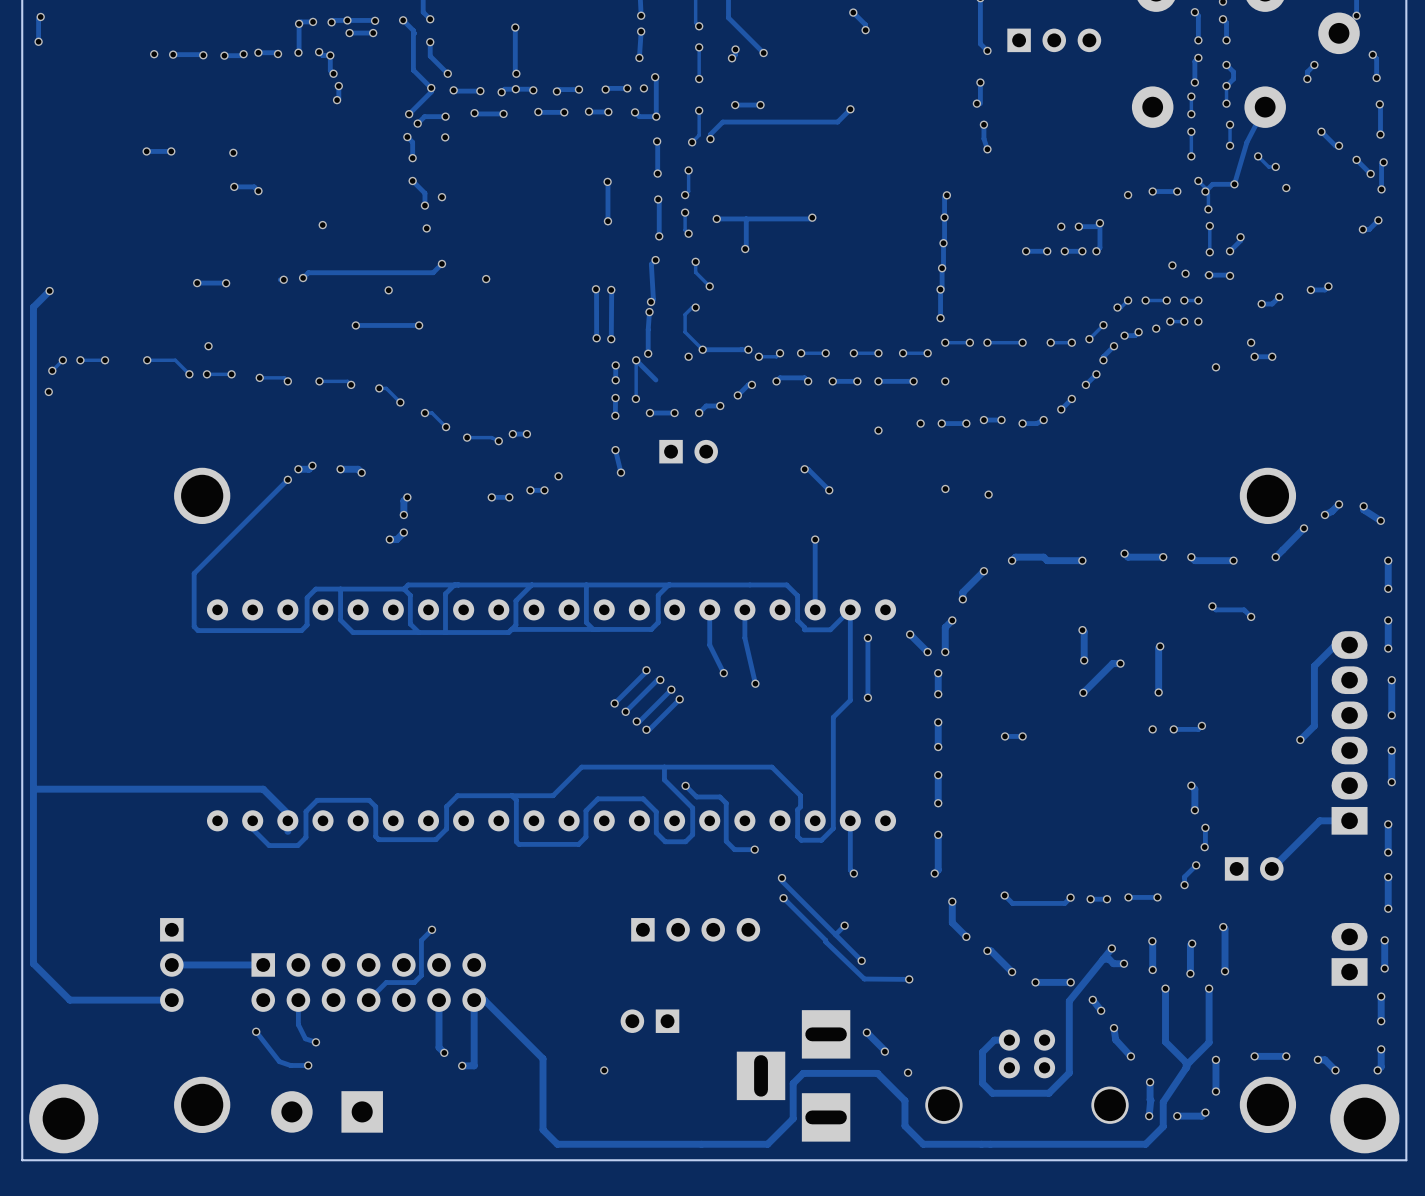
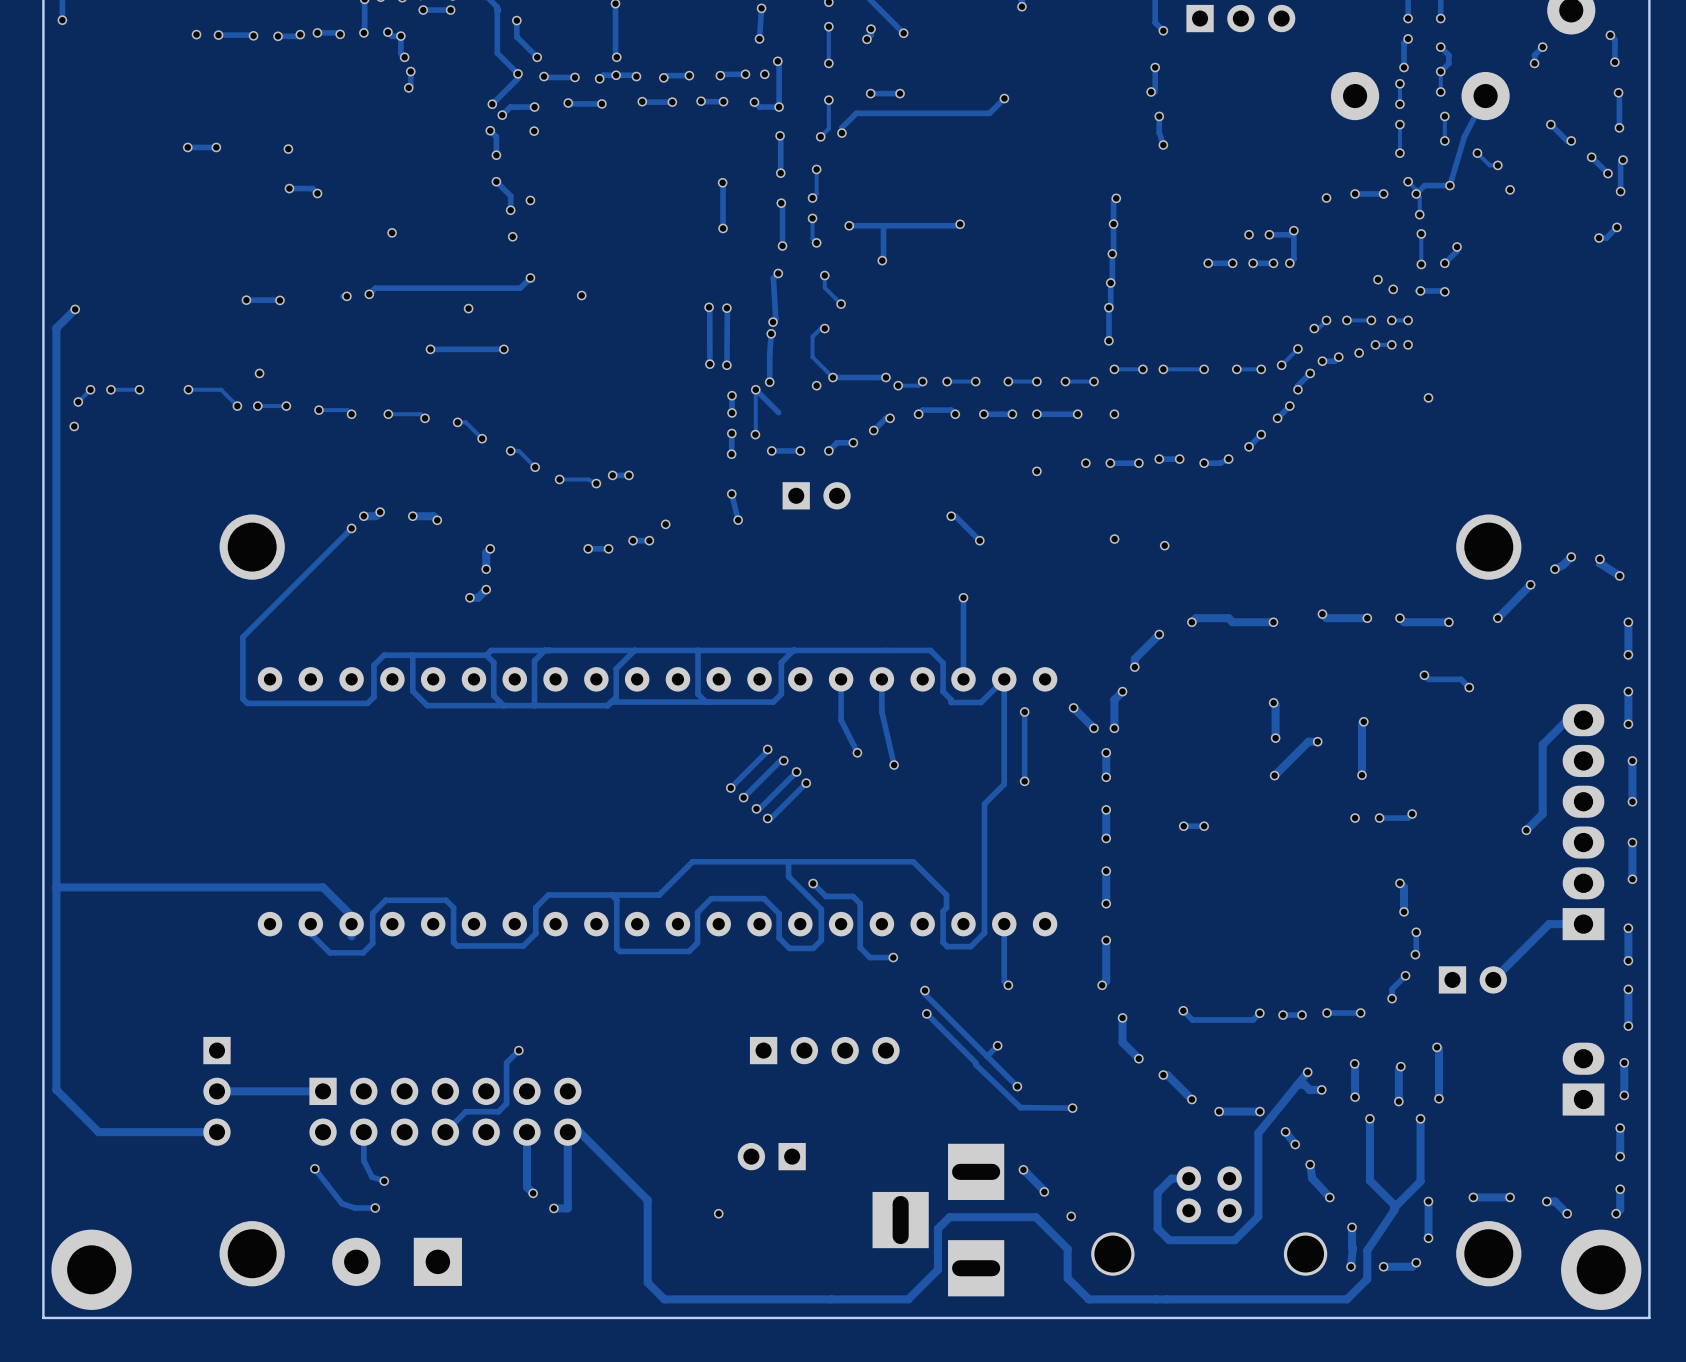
track: (1328, 286) (1324, 289) (1310, 289) -> none
via: (1328, 286) -> none
via: (1310, 289) -> none
track: (1279, 296) (1272, 304) (1261, 304) -> none
via: (1279, 296) -> none
via: (1261, 304) -> none
via: (1251, 342) -> none
via: (1254, 356) -> none
track: (1272, 356) (1254, 356) -> none
via: (1272, 356) -> none

